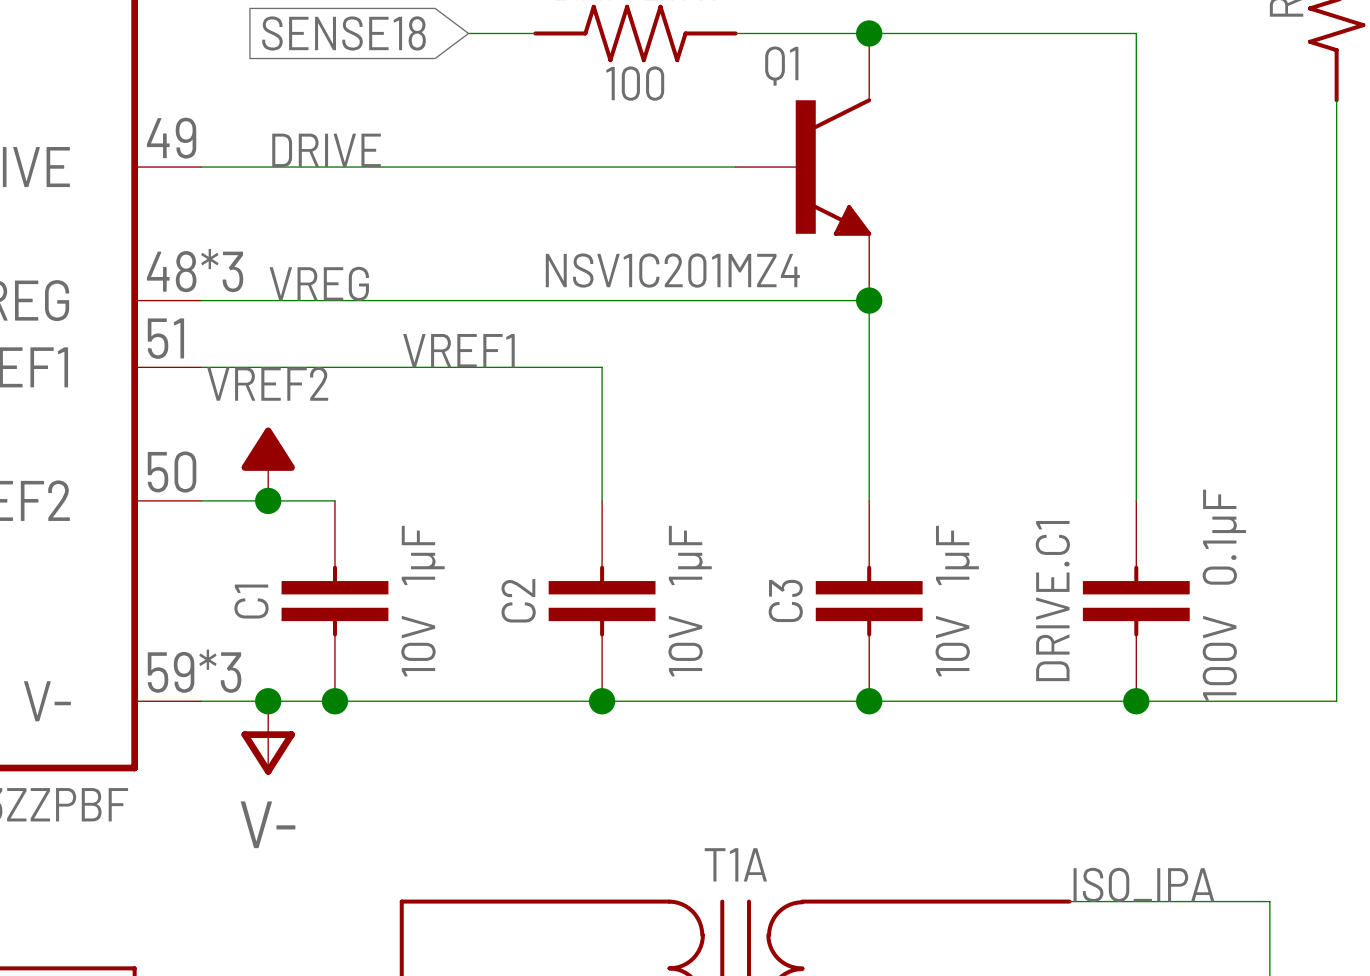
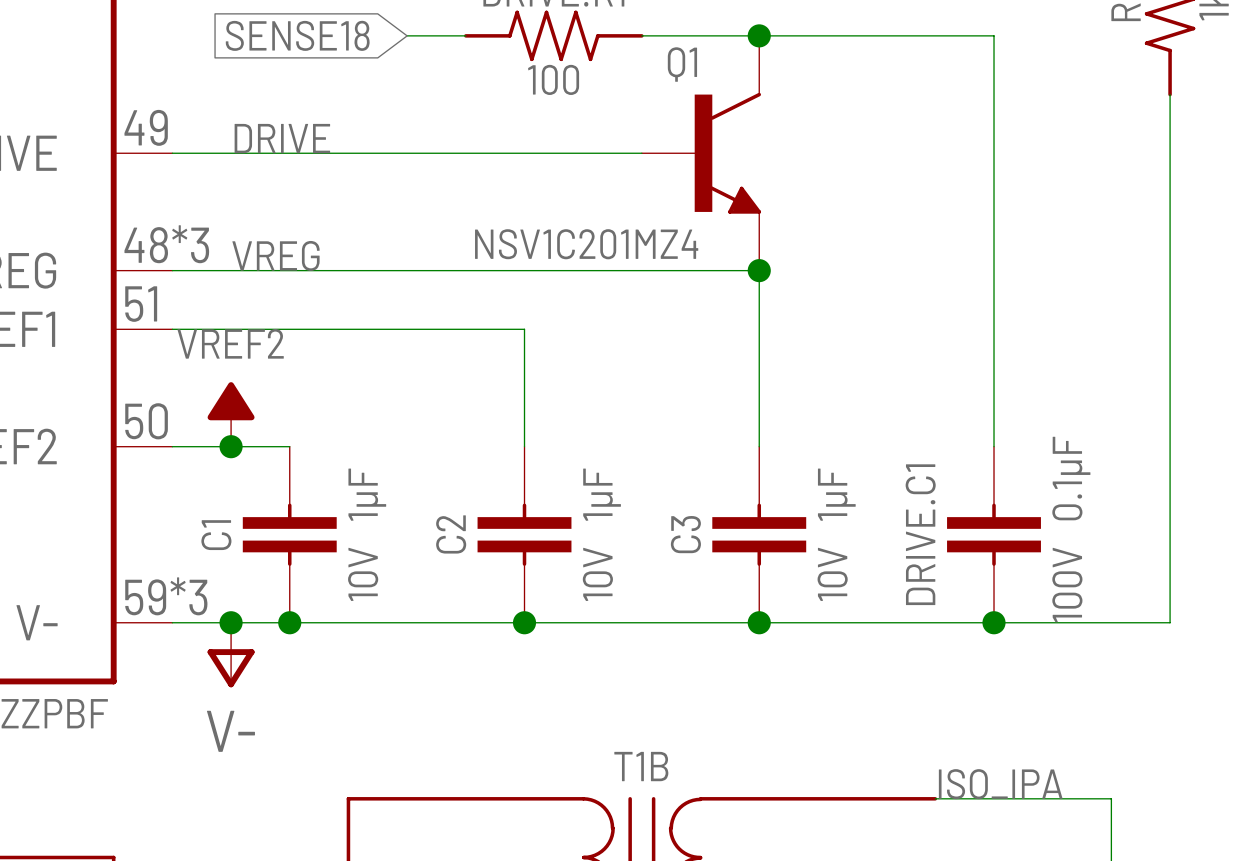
label: VREF1 (458, 350) -> none
T1A name: T1A (735, 864) -> T1B (641, 766)

